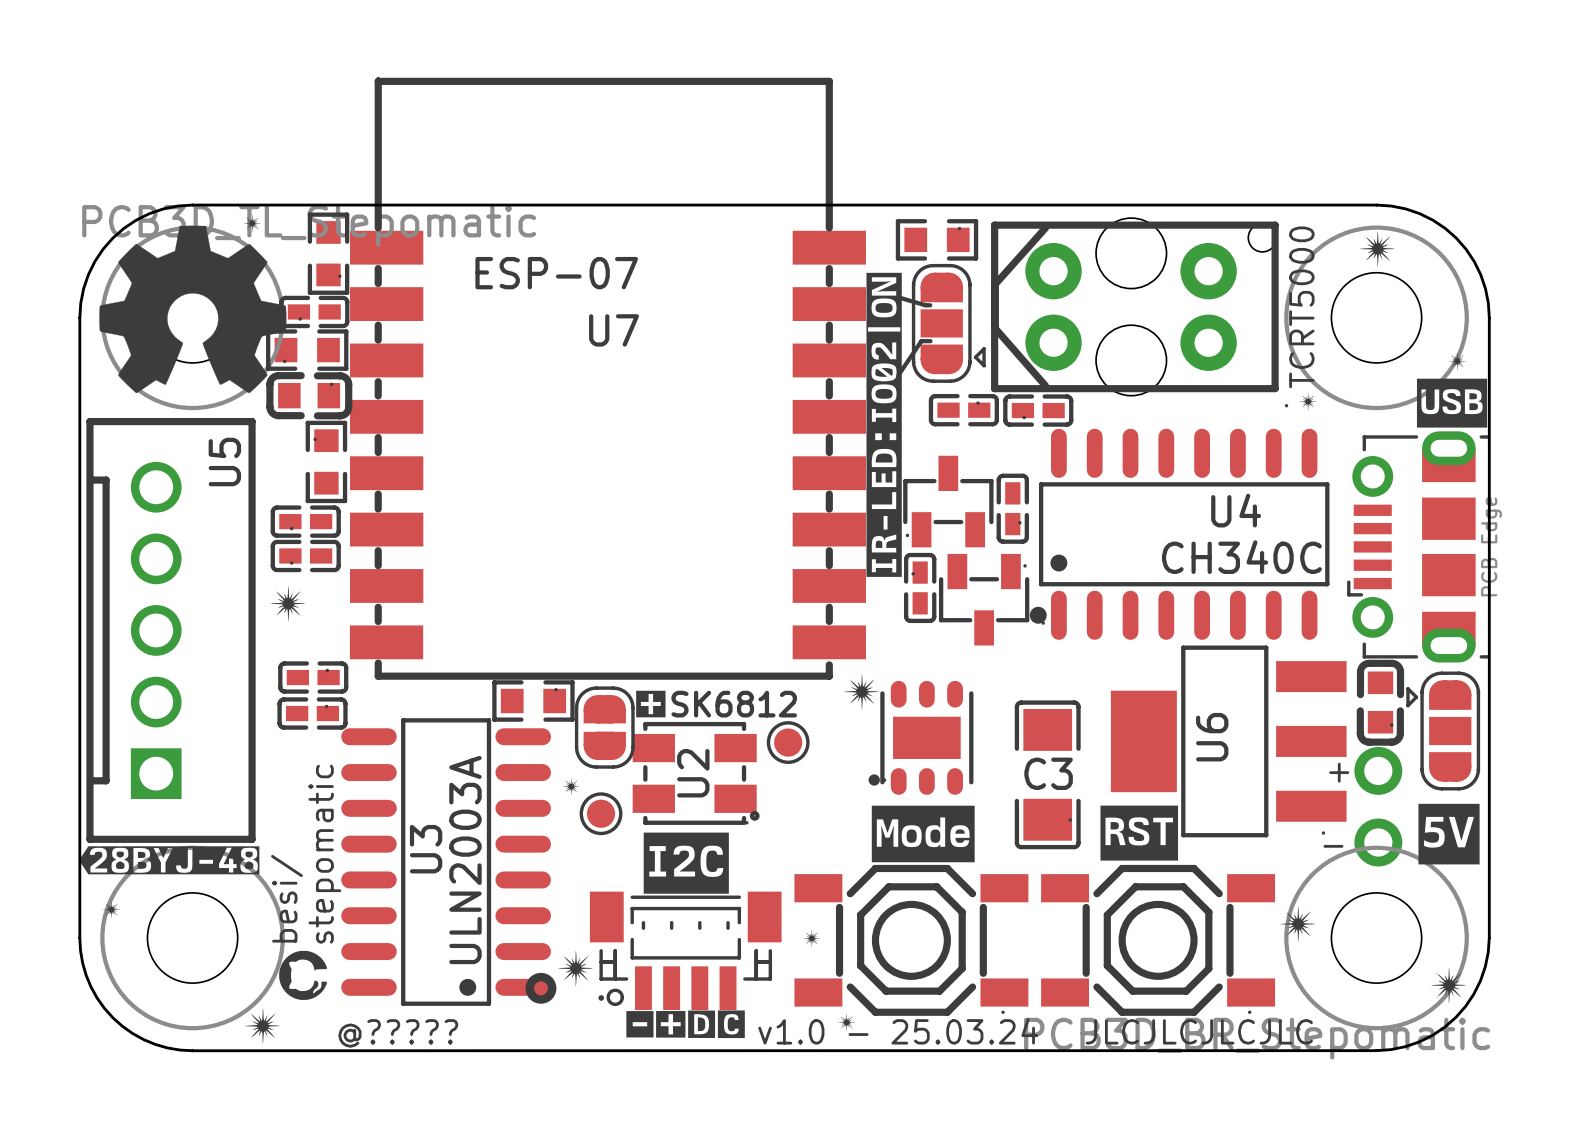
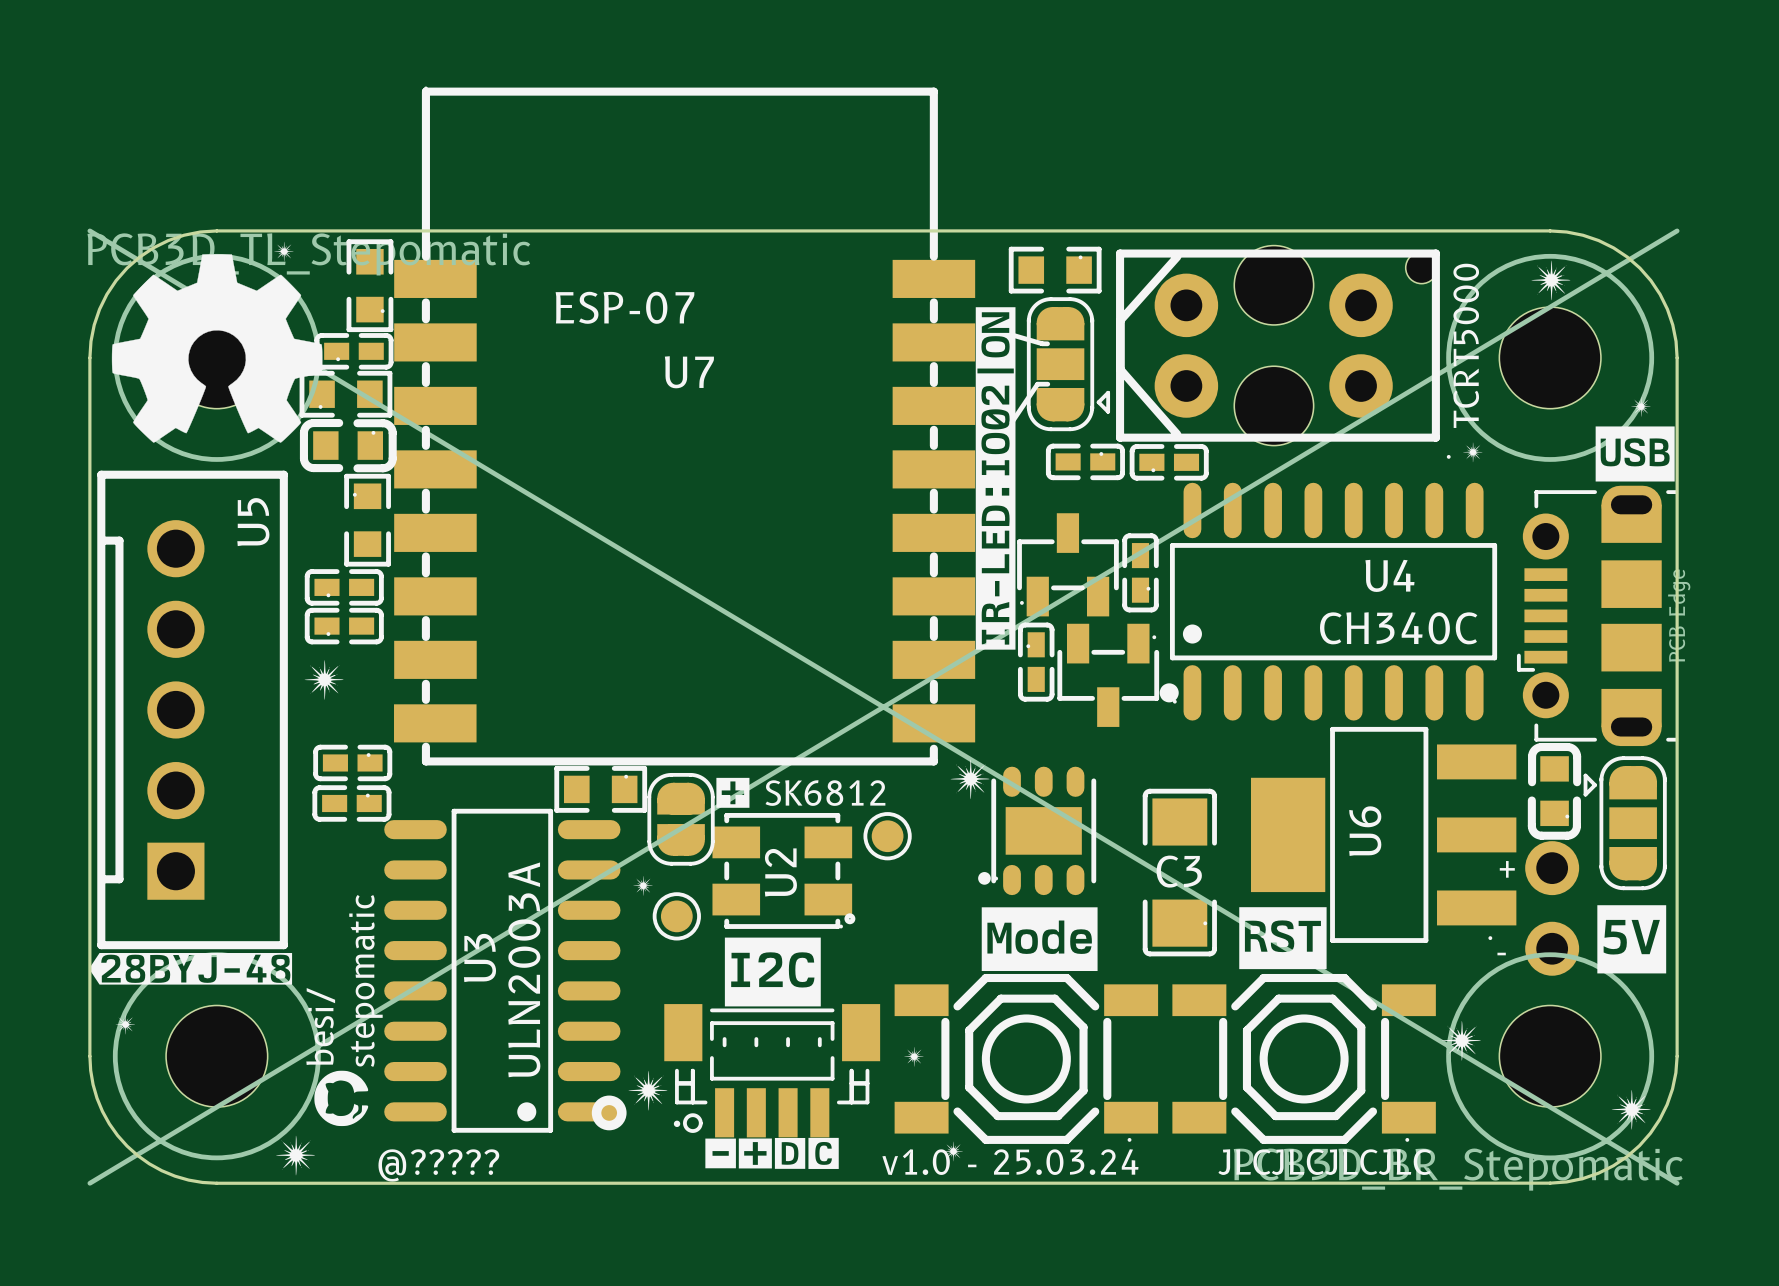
line: none -> (89, 230) (1677, 1183)
line: none -> (1677, 230) (89, 1183)

